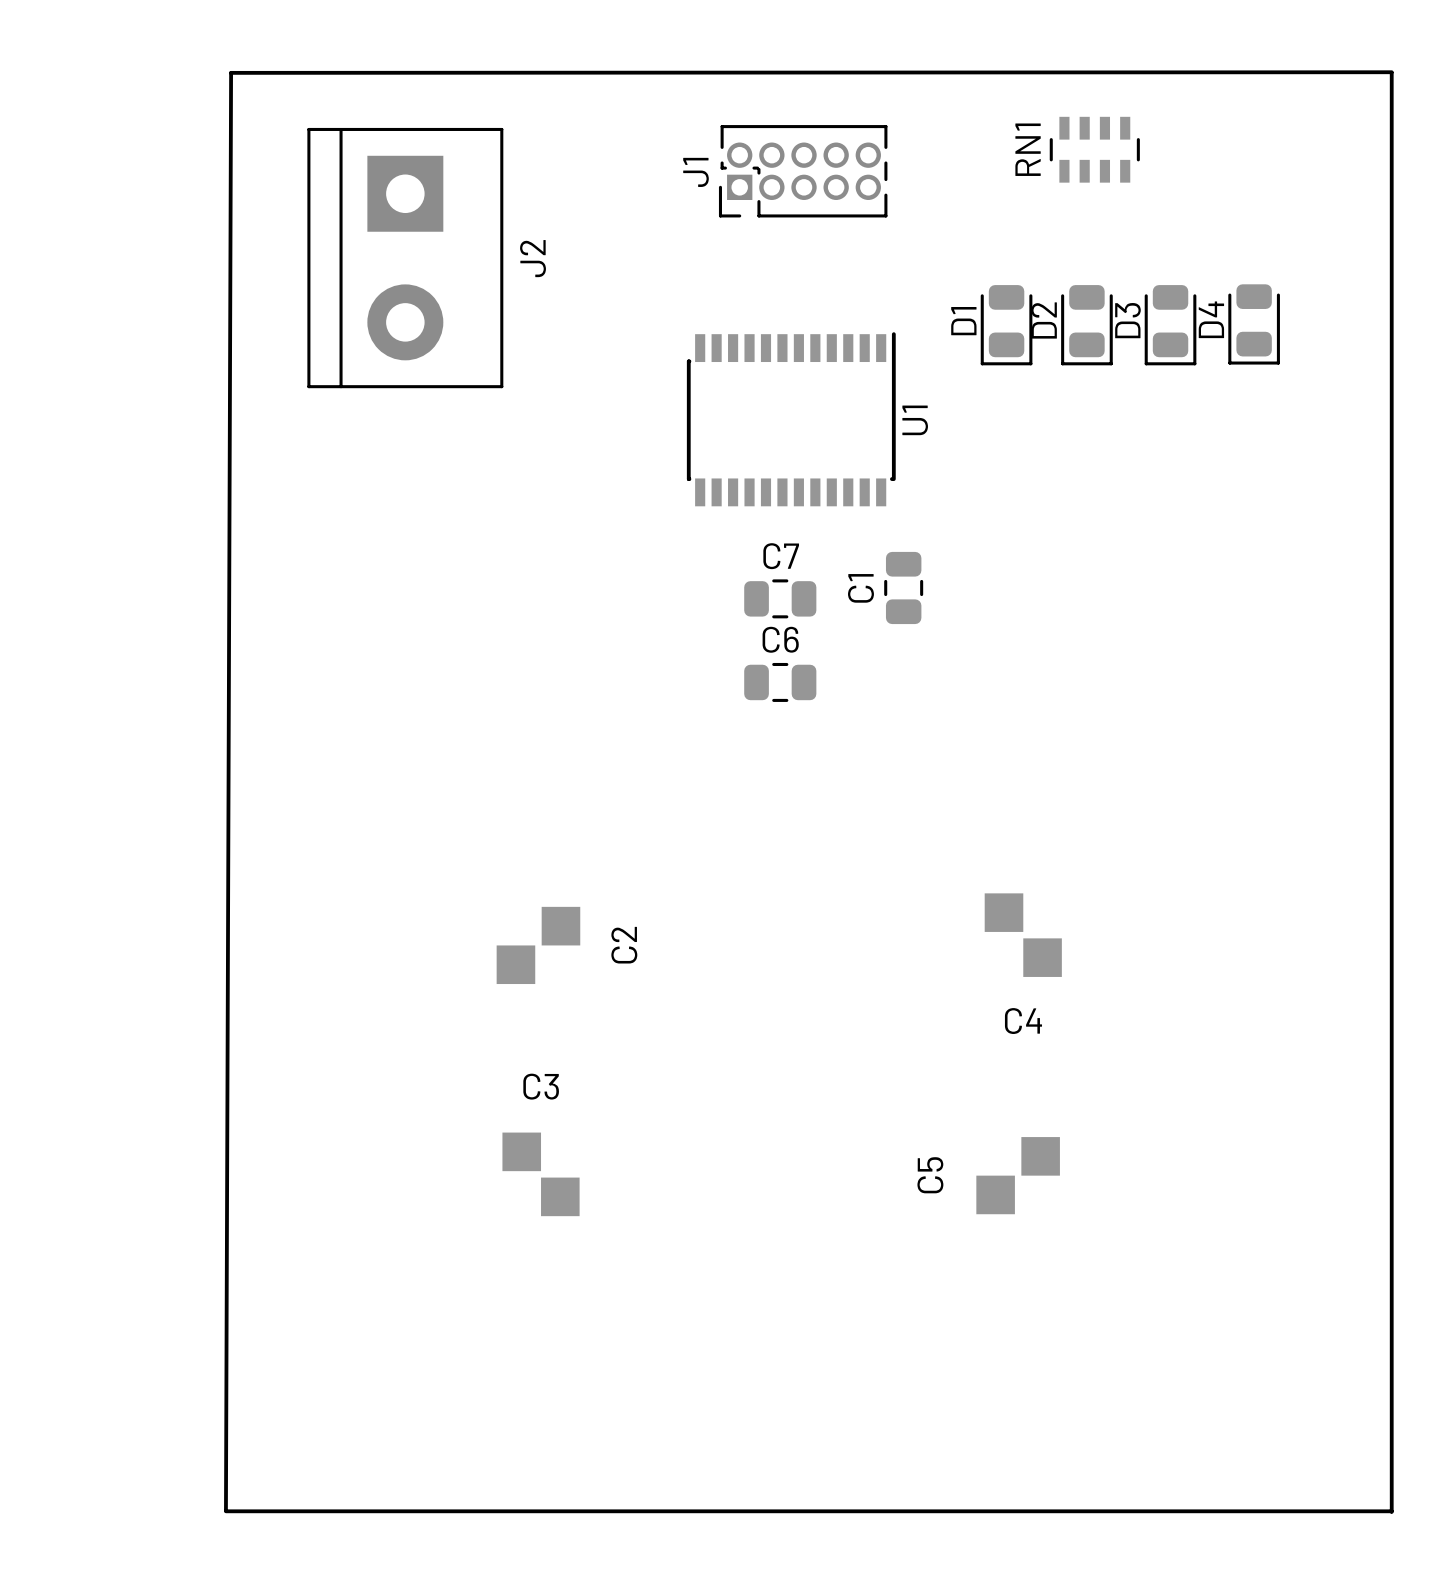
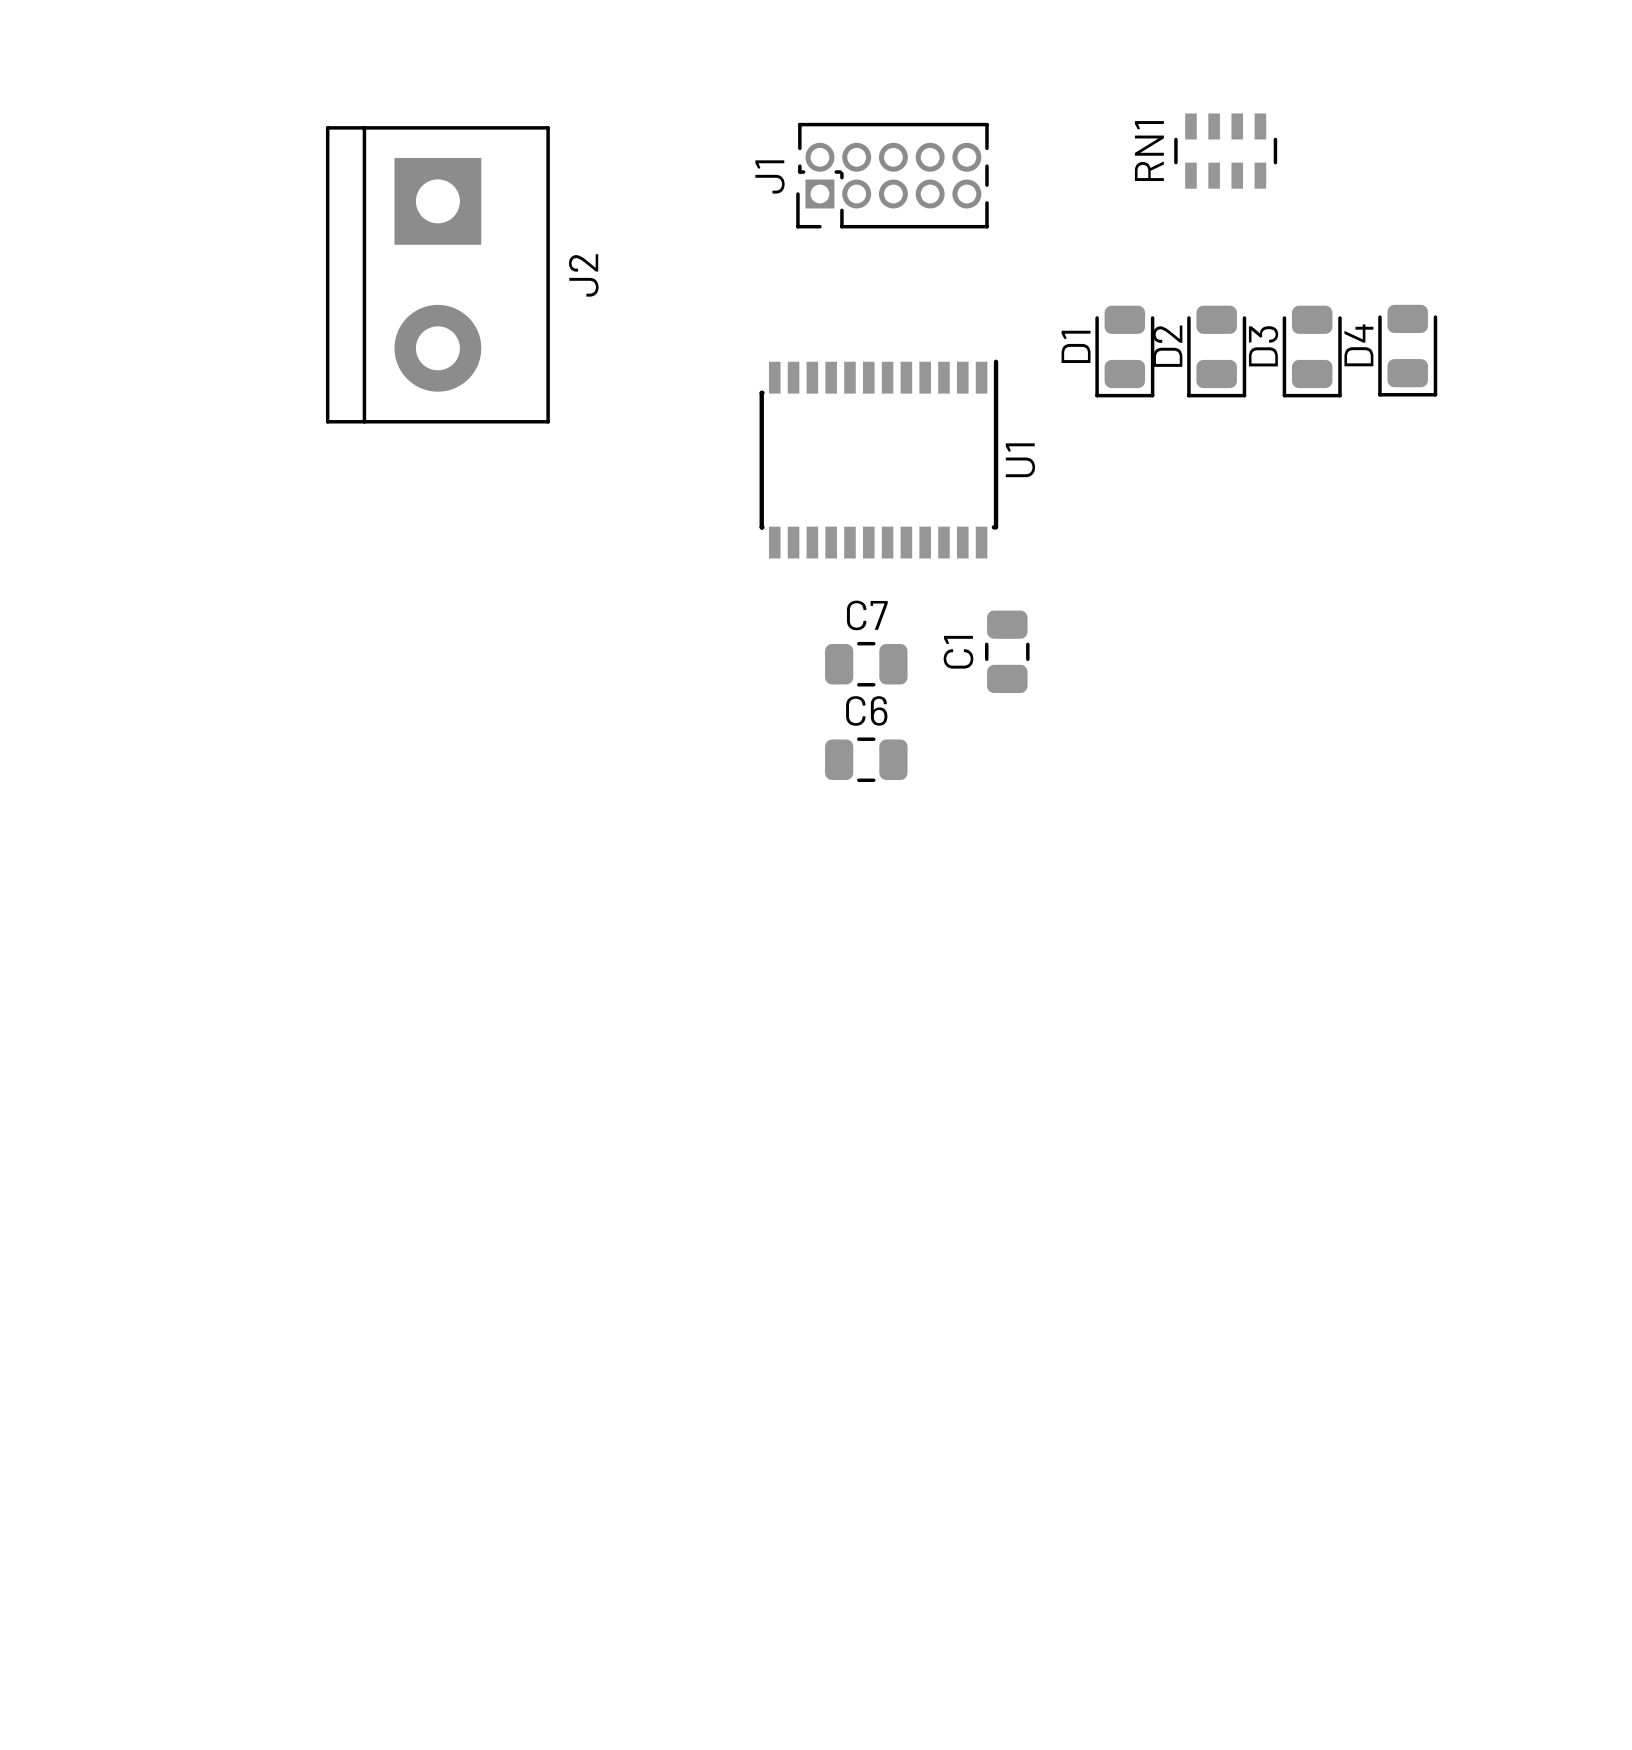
board edge: (1391, 72) (231, 72) (225, 1510) -> none
board edge: (1391, 72) (1391, 1511) -> none
C4: (1023, 935) -> none
C2: (538, 945) -> none
C3: (541, 1174) -> none
C5: (1018, 1175) -> none
board edge: (225, 1511) (1391, 1511) -> none

